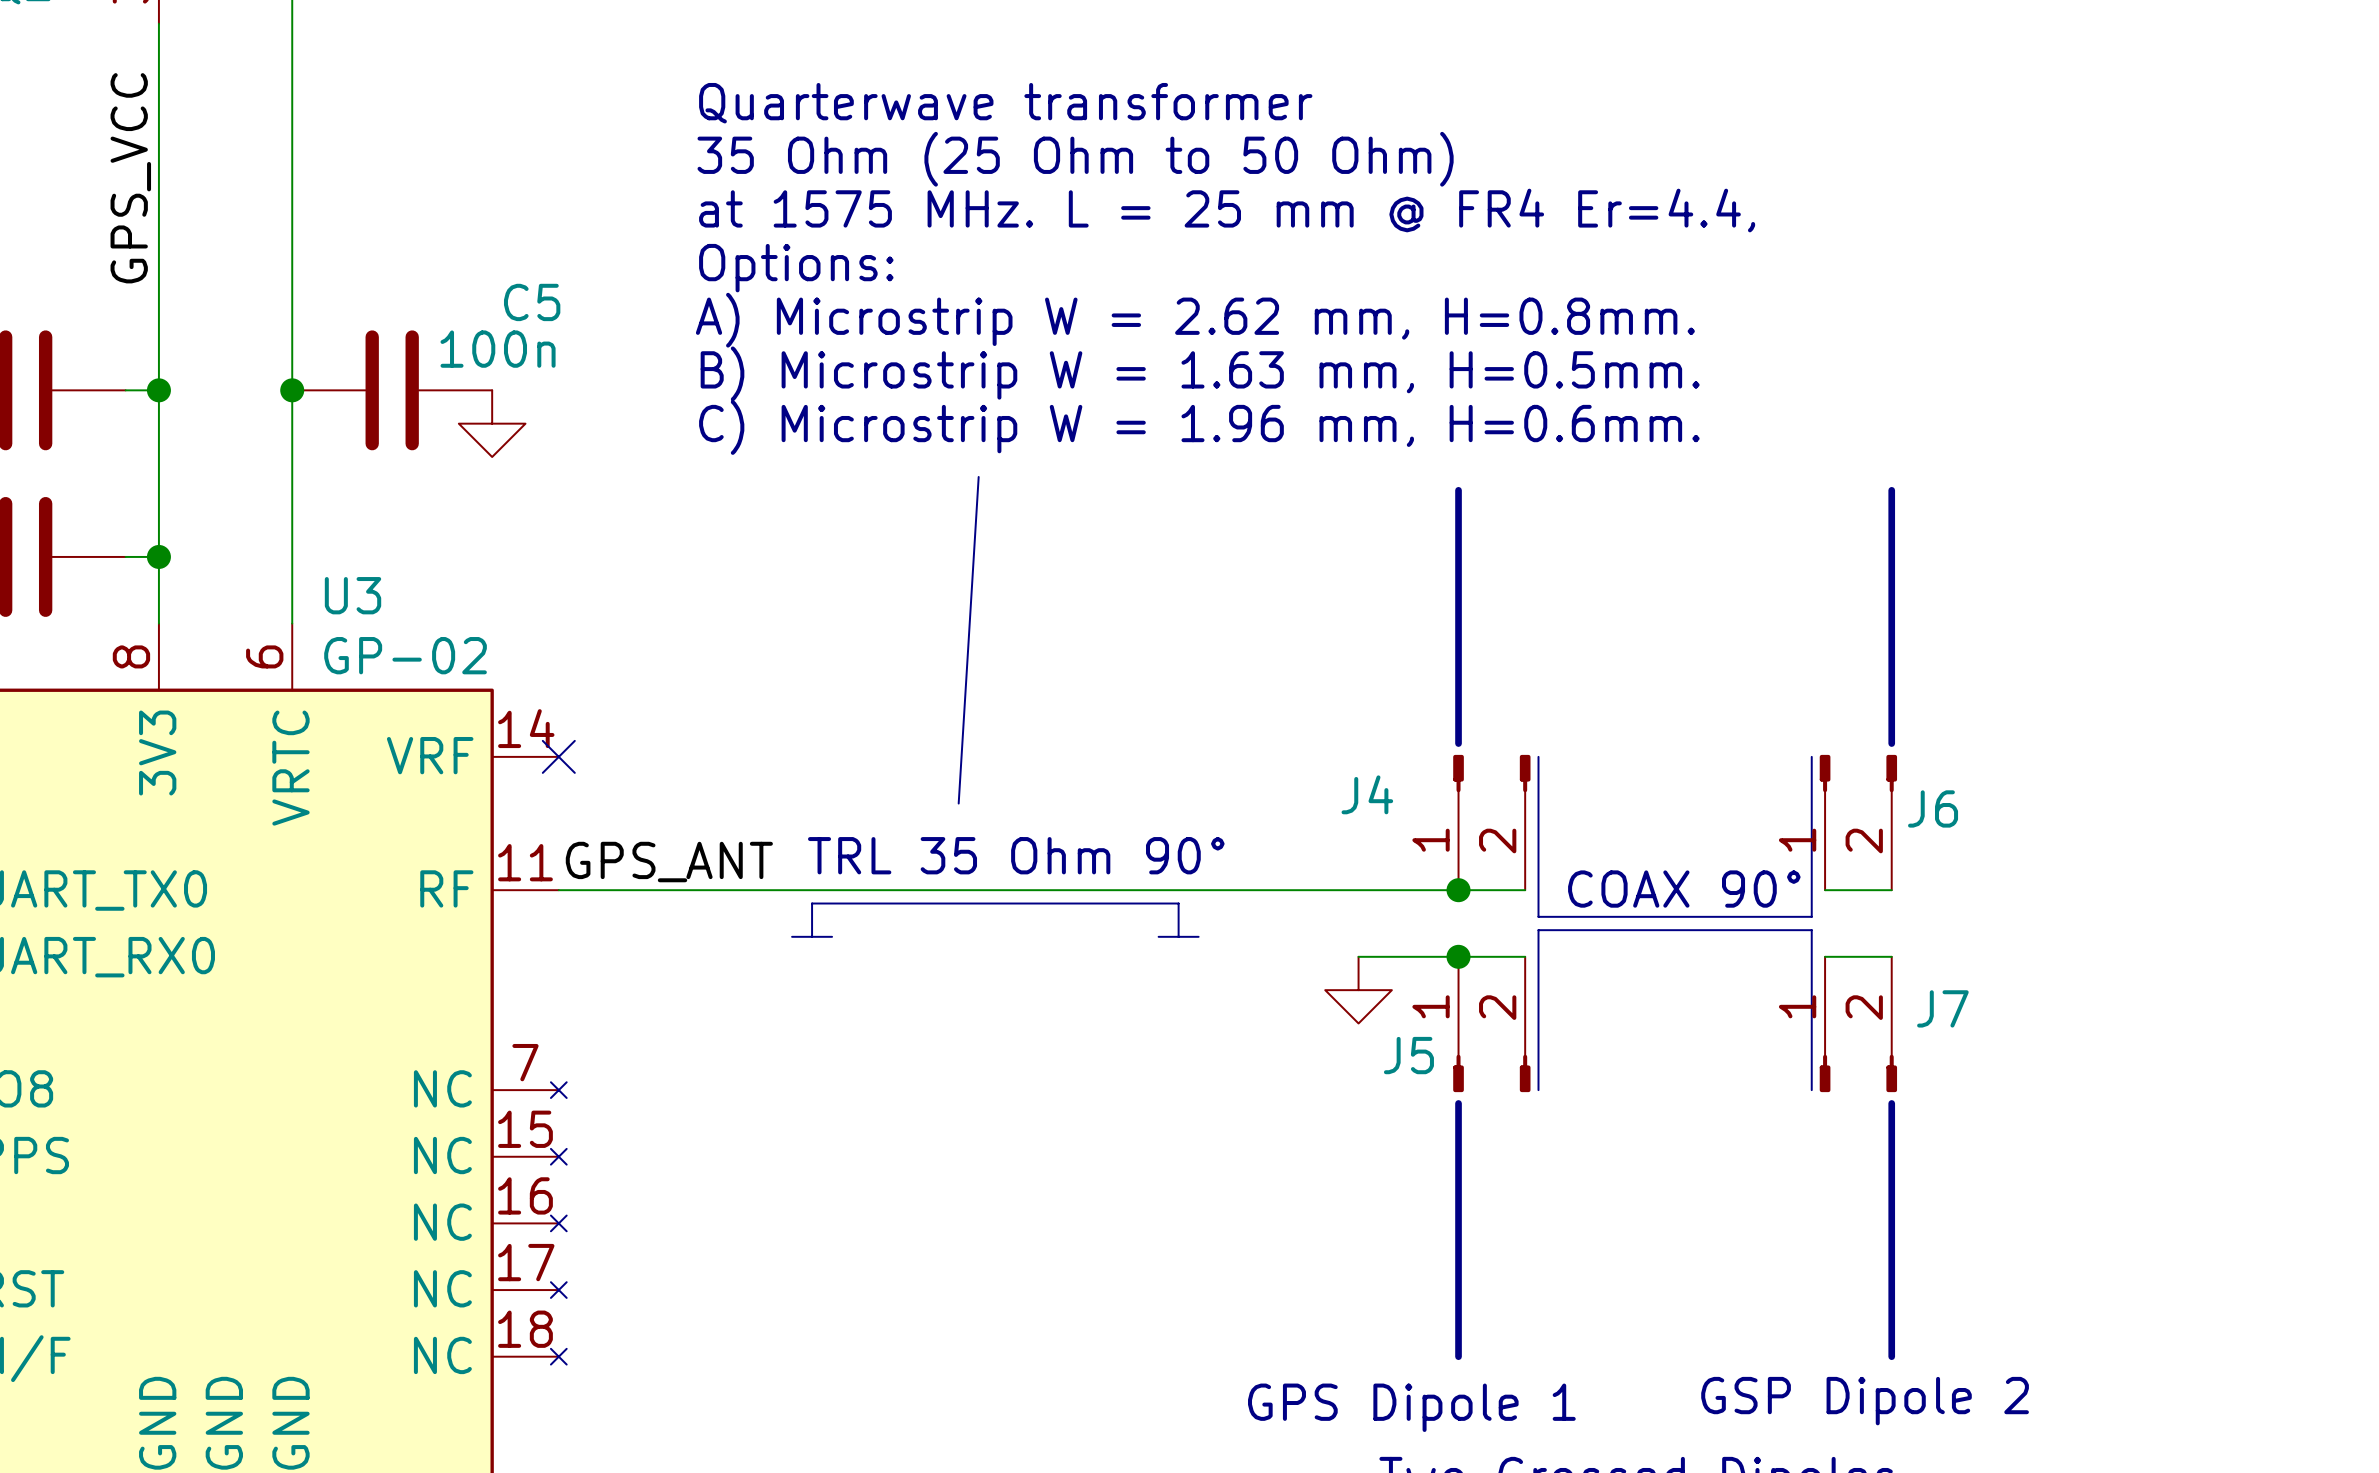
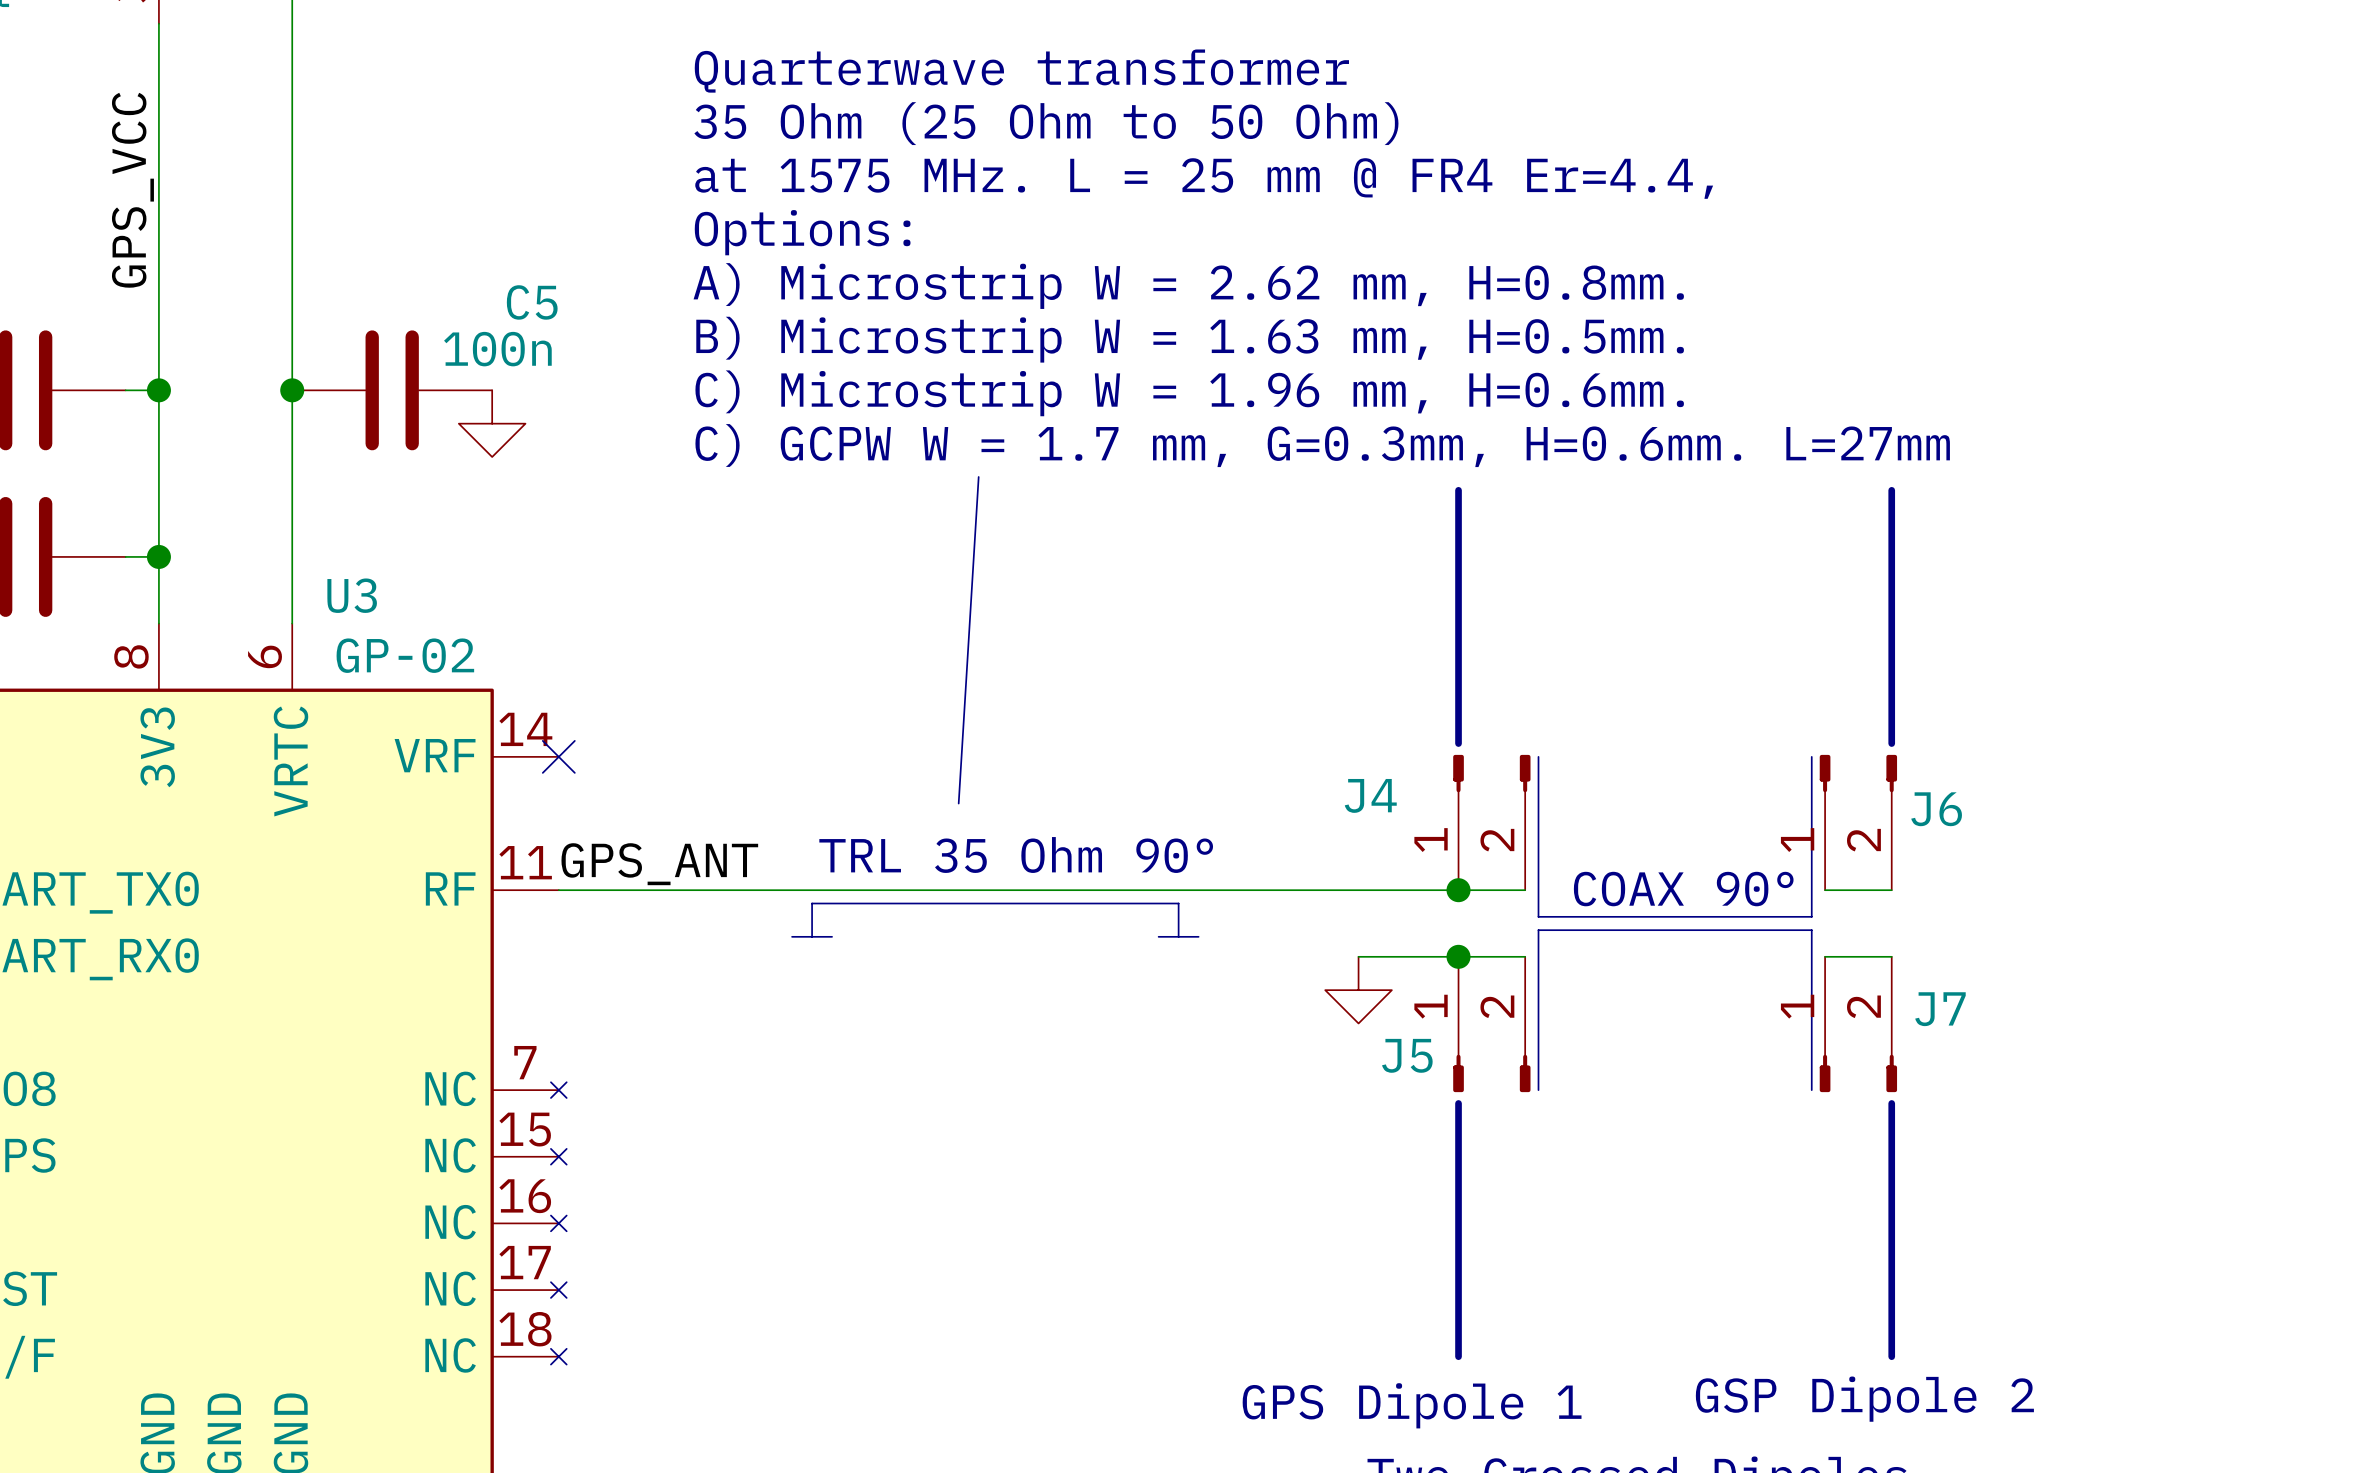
text position: Quarterwave transformer (1005, 103) -> Quarterwave transformer (1021, 71)
text position: 35 Ohm (25 Ohm to 50 Ohm) (1075, 159) -> 35 Ohm (25 Ohm to 50 Ohm) (1046, 123)
text position: at 1575 MHz. L = 25 mm @ FR4 Er=4.4, (1227, 210) -> at 1575 MHz. L = 25 mm @ FR4 Er=4.4, (1204, 178)
text position: Options: (796, 268) -> Options: (802, 232)
text position: A) Microstrip W = 2.62 mm, H=0.8mm. (1195, 320) -> A) Microstrip W = 2.62 mm, H=0.8mm. (1188, 286)
text position: B) Microstrip W = 1.63 mm, H=0.5mm. (1200, 373) -> B) Microstrip W = 1.63 mm, H=0.5mm. (1190, 339)
text position: C) Microstrip W = 1.96 mm, H=0.6mm. (1199, 427) -> C) Microstrip W = 1.96 mm, H=0.6mm. (1189, 393)
text: none -> C) GCPW W = 1.7 mm, G=0.3mm, H=0.6mm. L=27mm (1322, 445)

